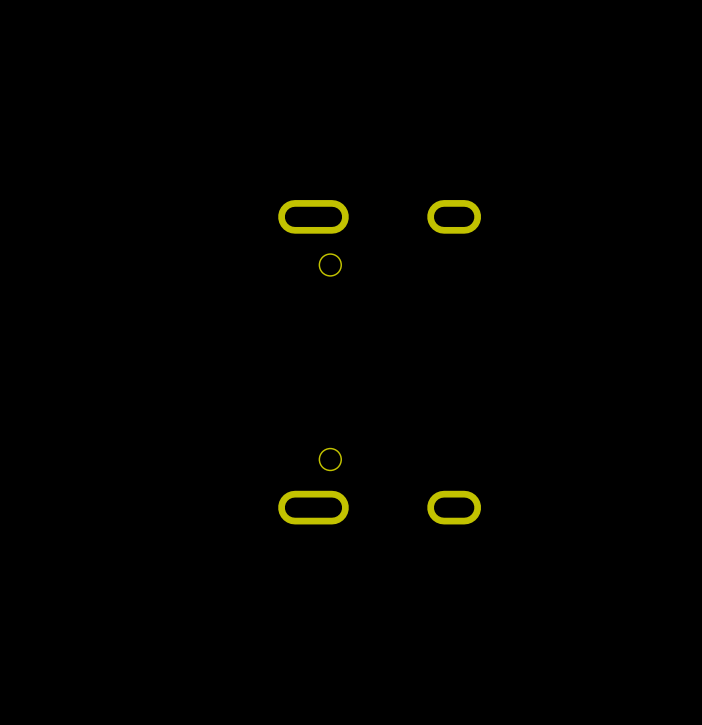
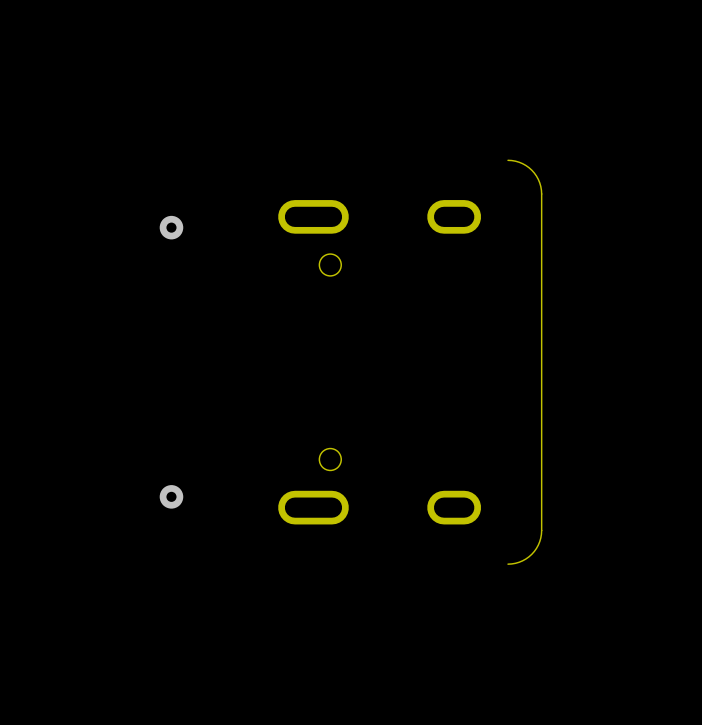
board edge: none -> (507, 160) (519, 162) (531, 170) (539, 182) (541, 193) (541, 534) (538, 545) (528, 556) (519, 562) (507, 564)
via: none -> (171, 227)
via: none -> (171, 496)

